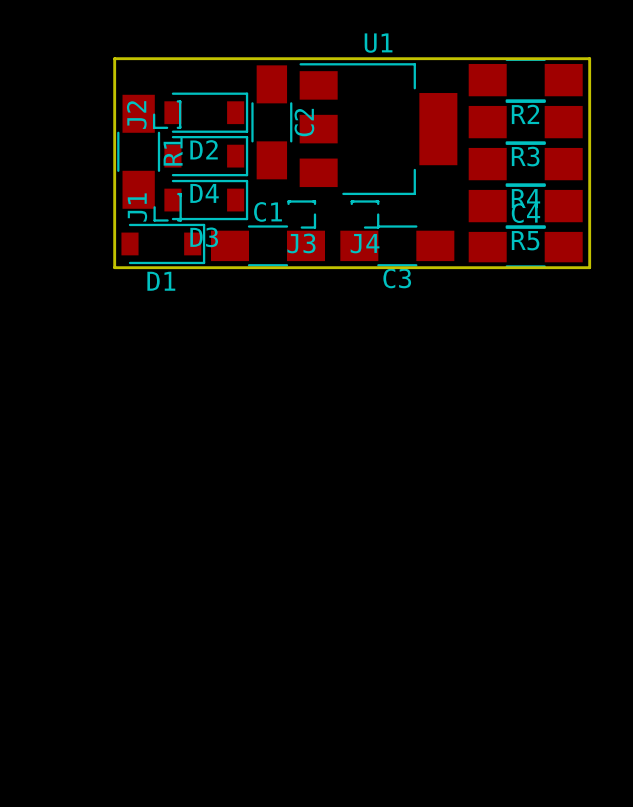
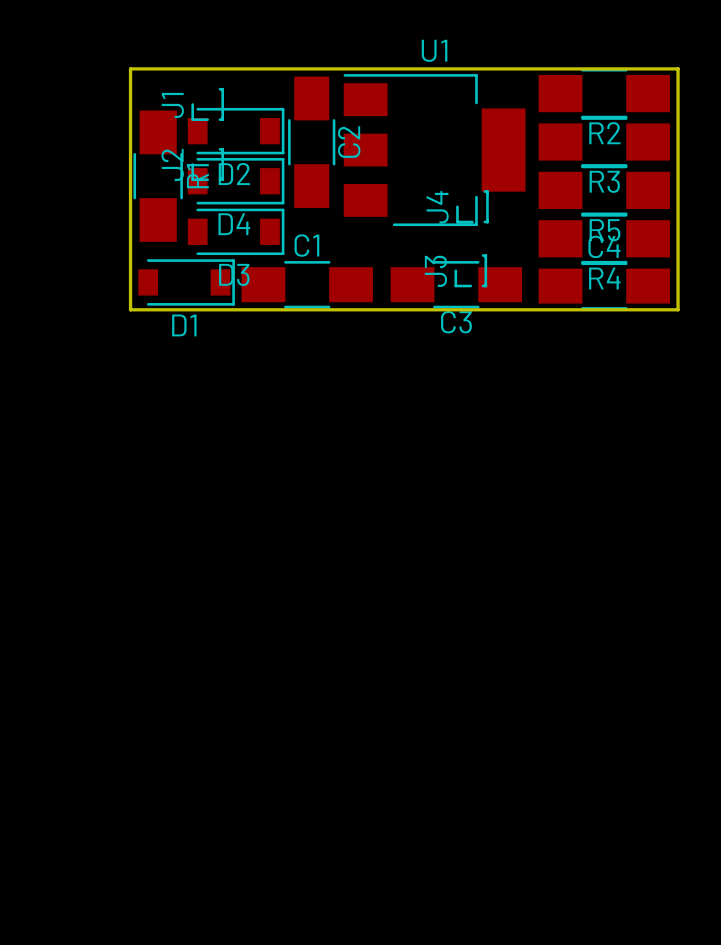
J2 position: (167, 114) -> (207, 164)
R4 name: R4 (525, 198) -> R5 (604, 230)
J1 position: (167, 207) -> (207, 104)
J3 rotation: 0° (301, 214) -> 90° clockwise (470, 270)
J3 position: (301, 214) -> (470, 270)
J4 rotation: 0° (364, 214) -> 90° clockwise (472, 206)
J4 position: (364, 214) -> (472, 206)
R5 name: R5 (525, 240) -> R4 (604, 278)

